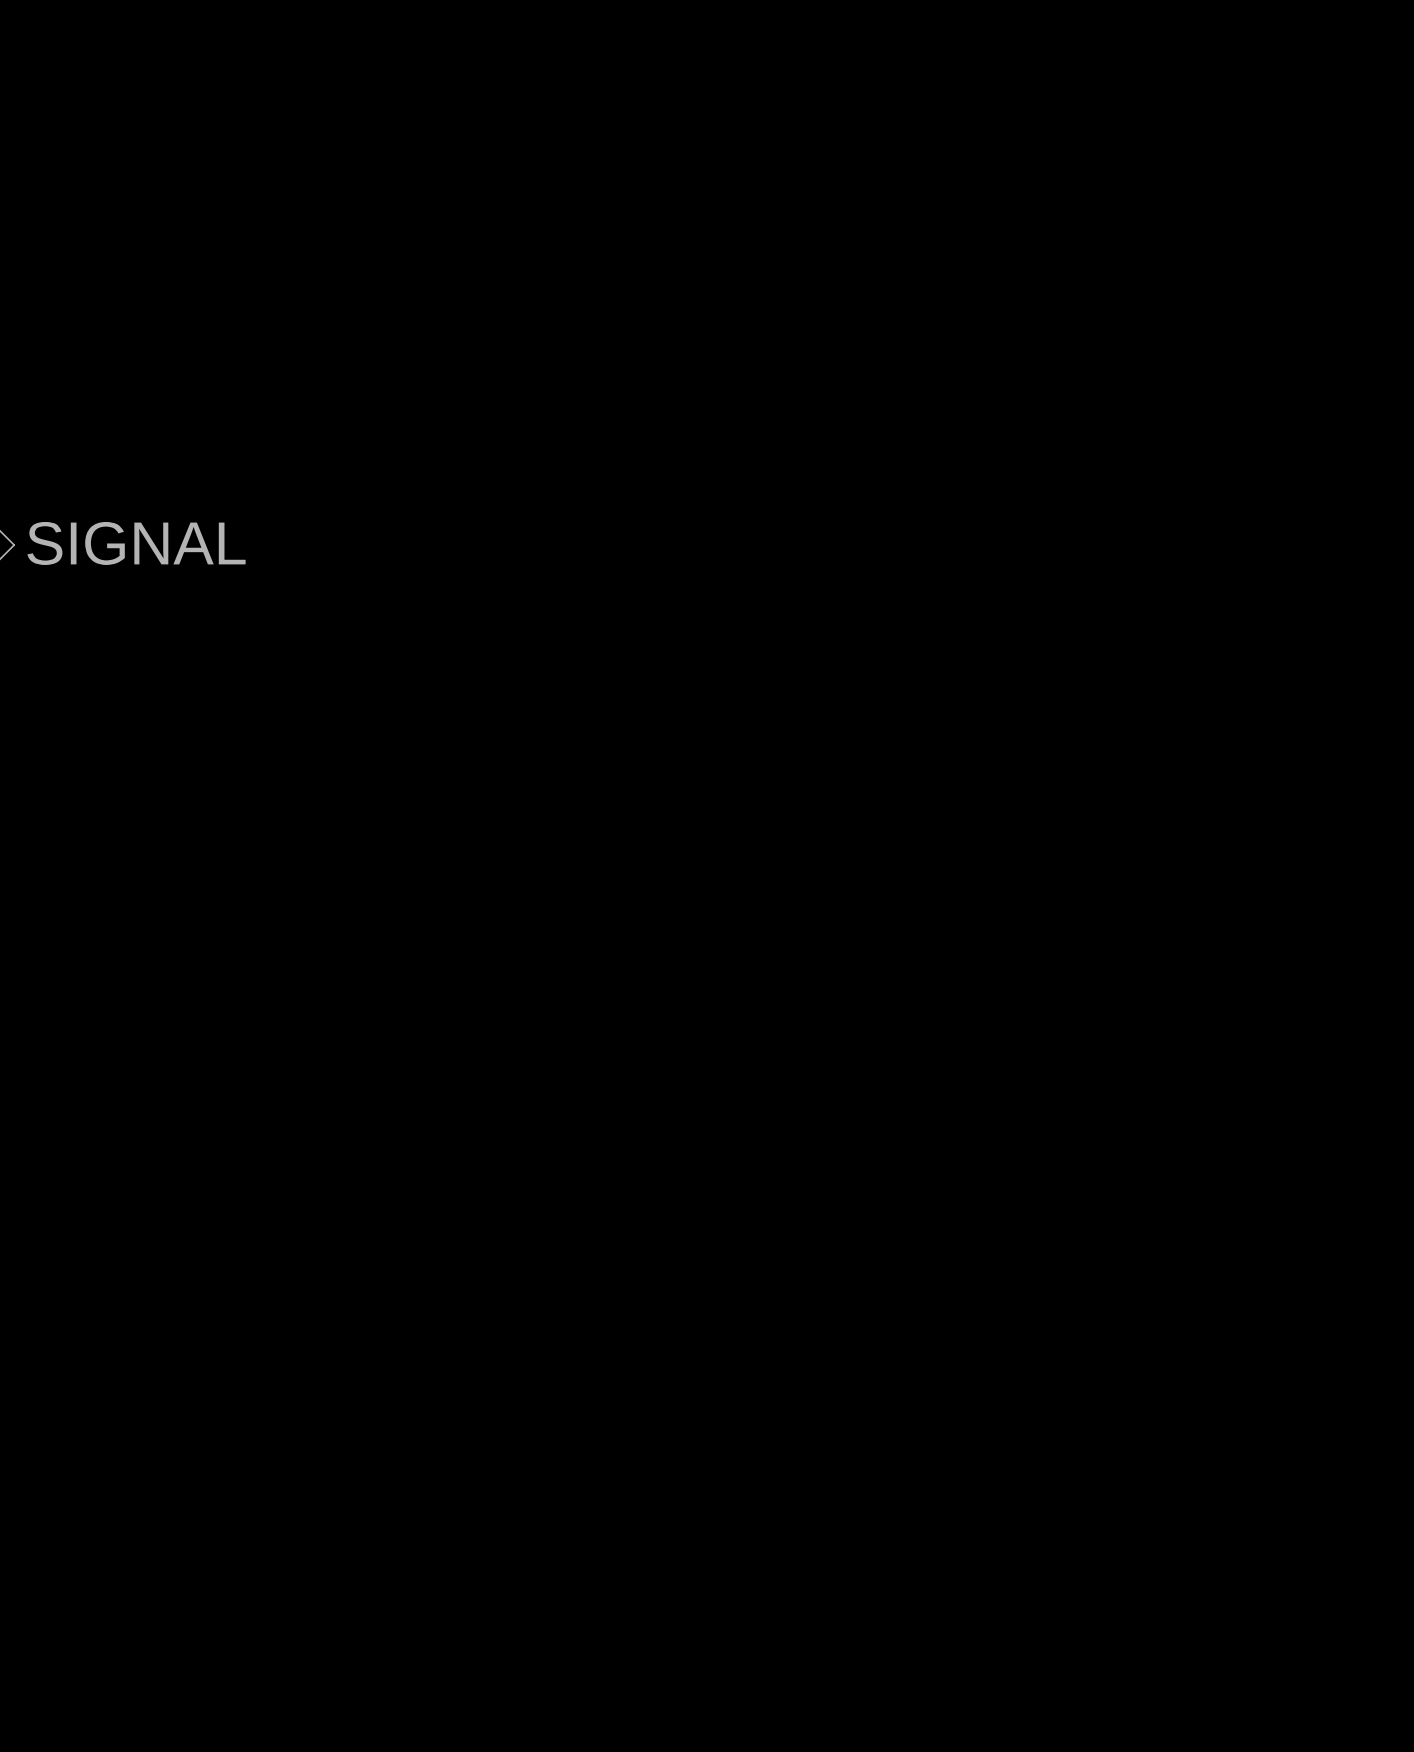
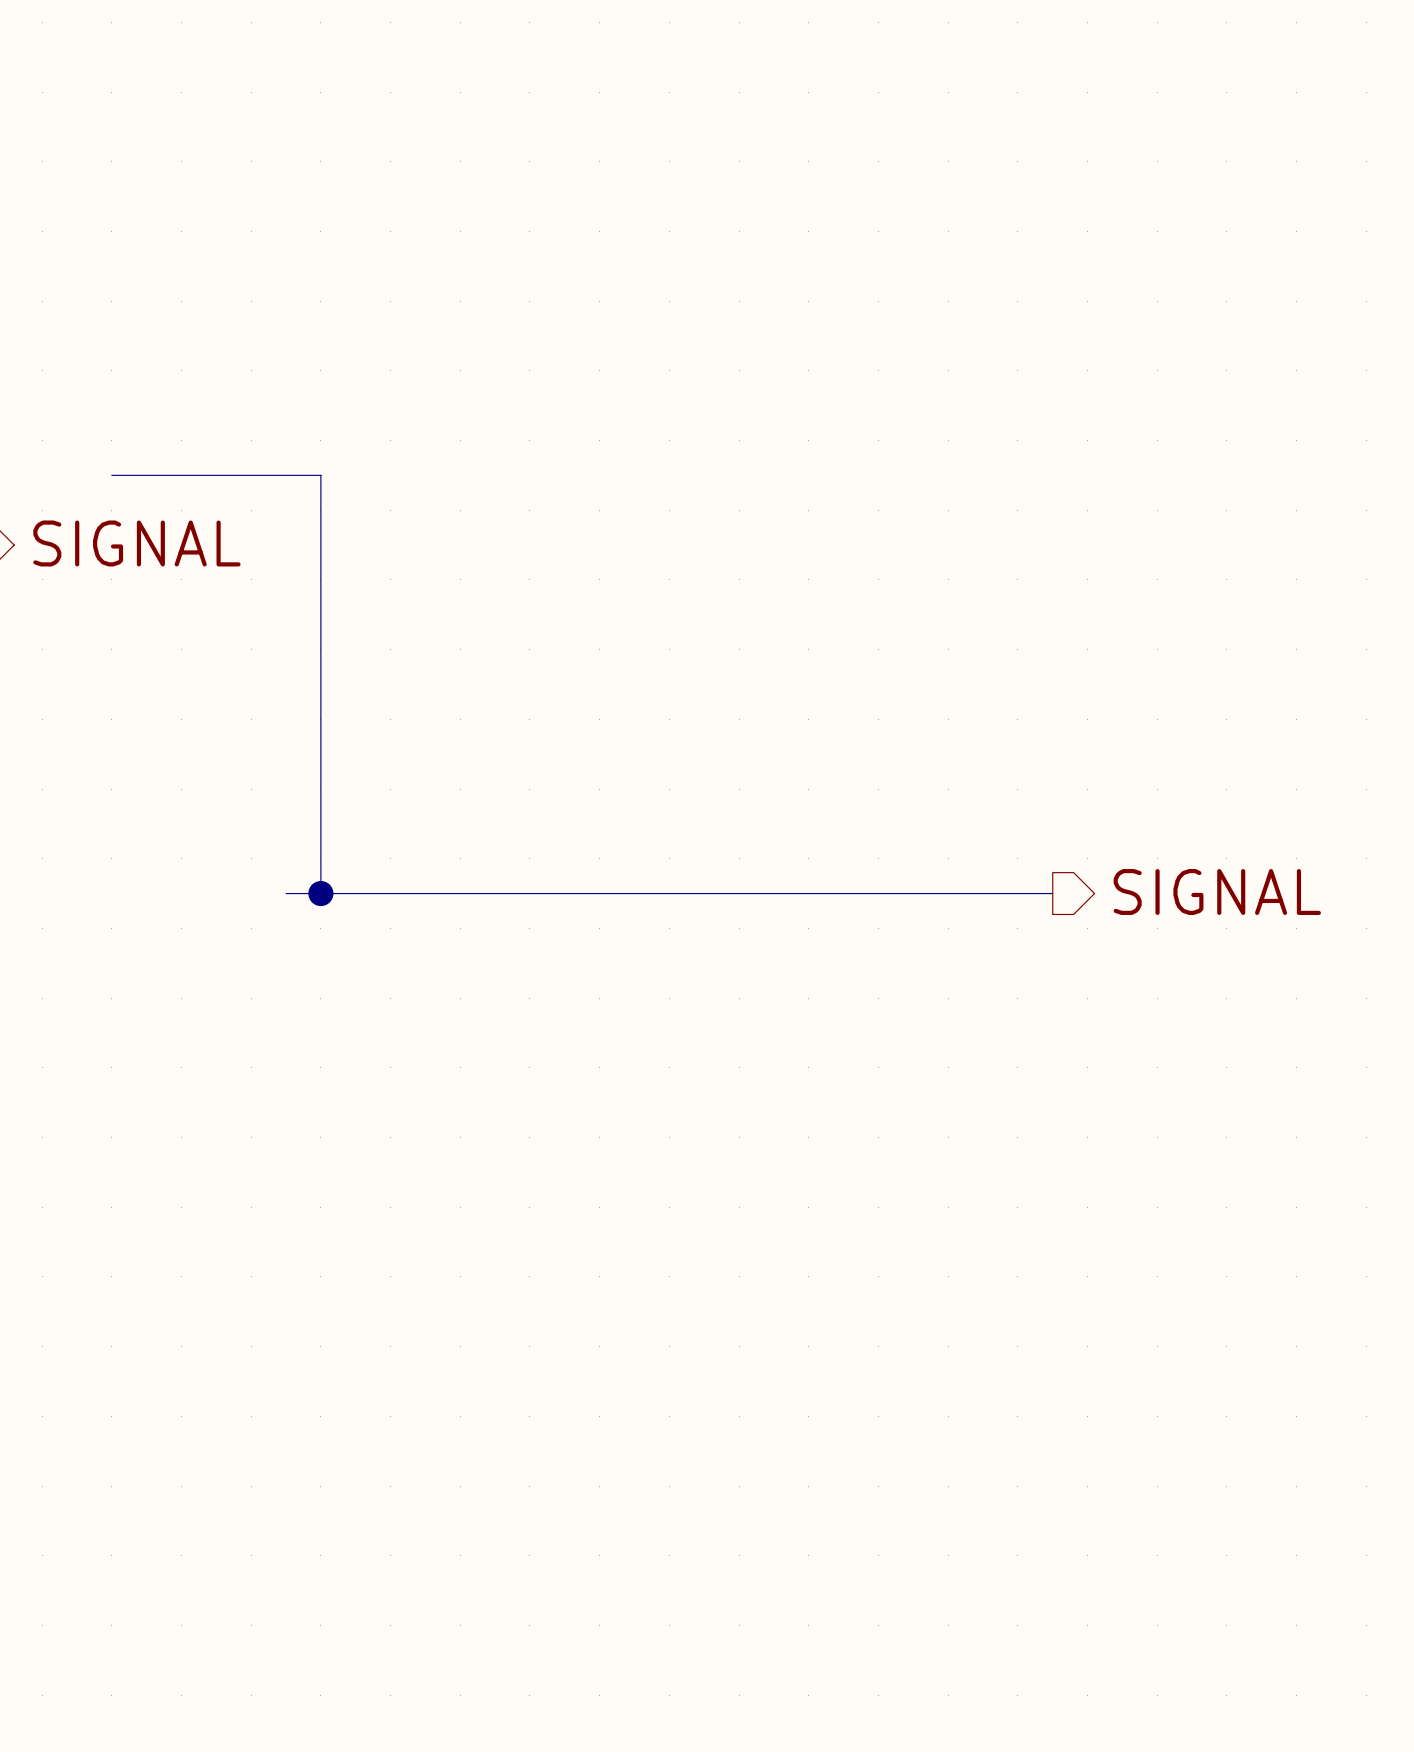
wire: none -> (111, 475) (320, 475) (320, 893)
hierarchical label: none -> SIGNAL (1217, 891)
wire: none -> (286, 893) (1052, 893)
junction: none -> (320, 893)

